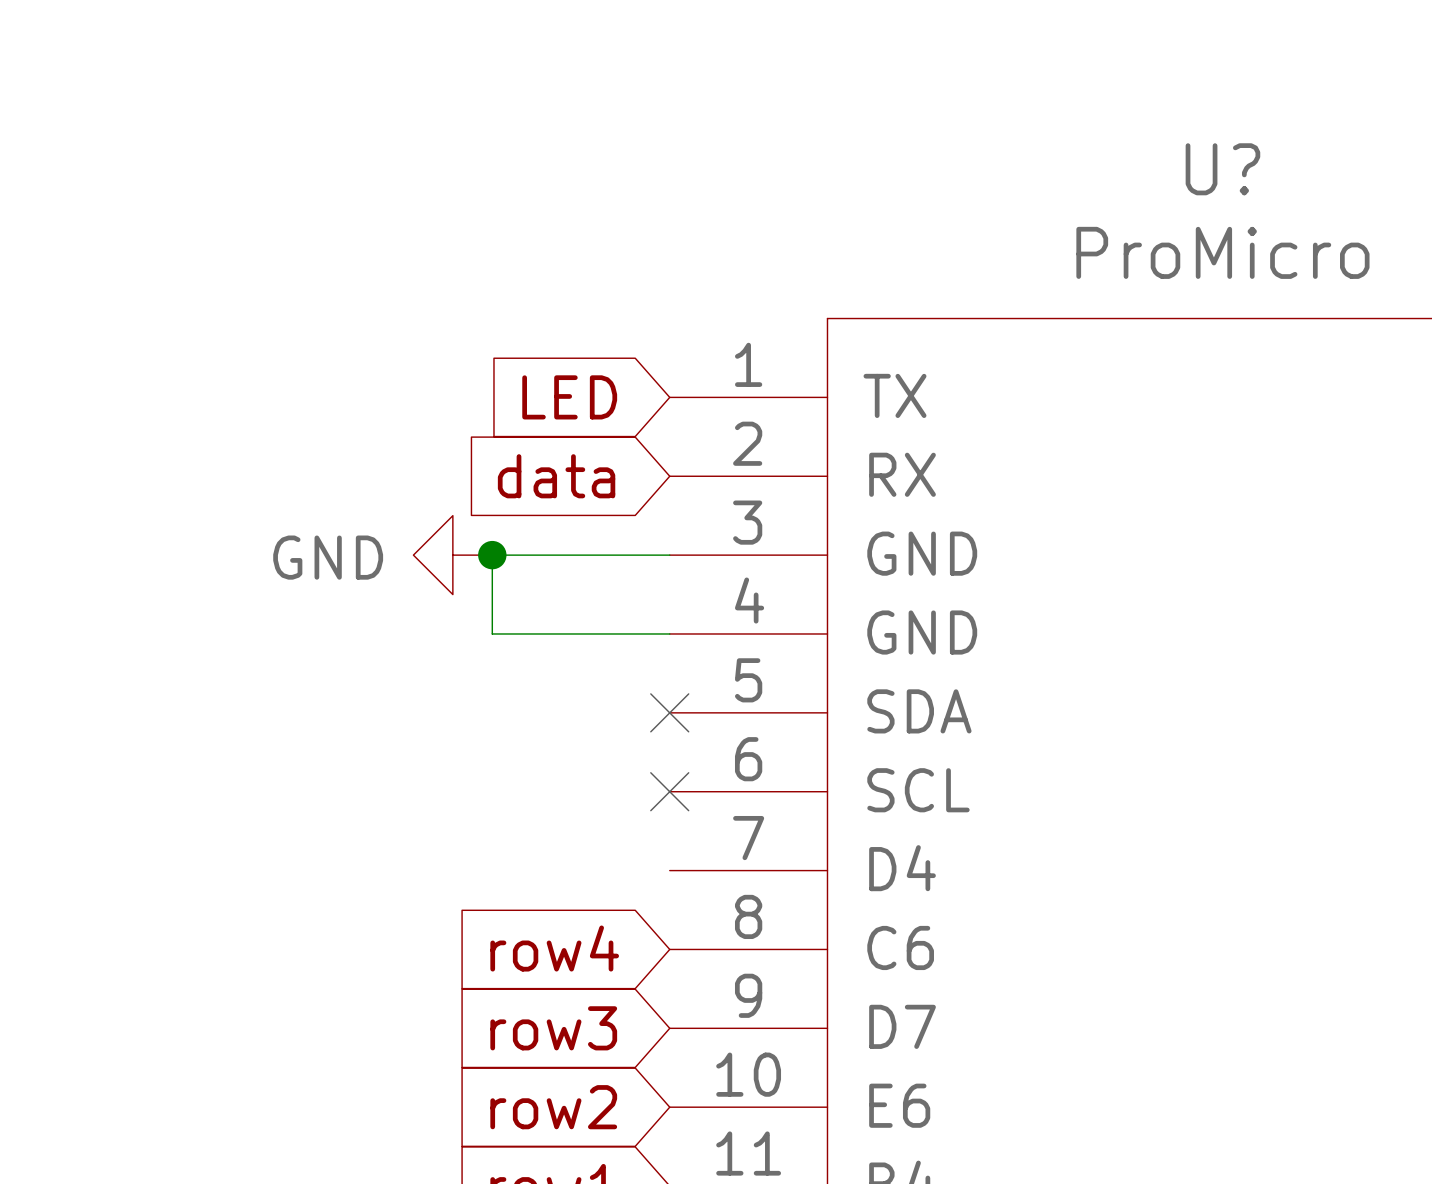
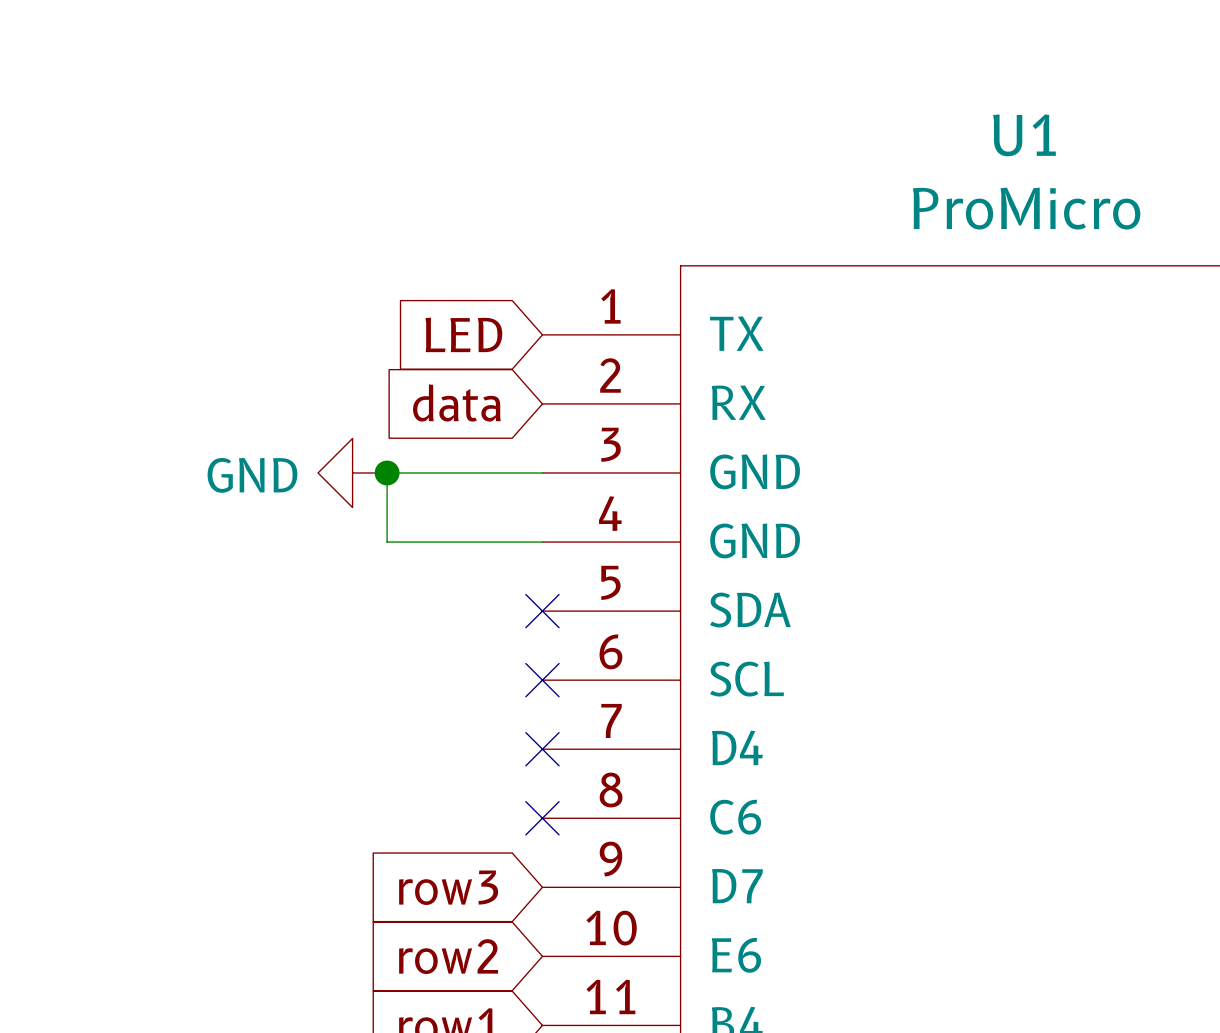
U? name: U? (1222, 169) -> U1 (1024, 135)
no-connect mark: none -> (542, 749)
global label: row4 (554, 948) -> none
no-connect mark: none -> (542, 818)

